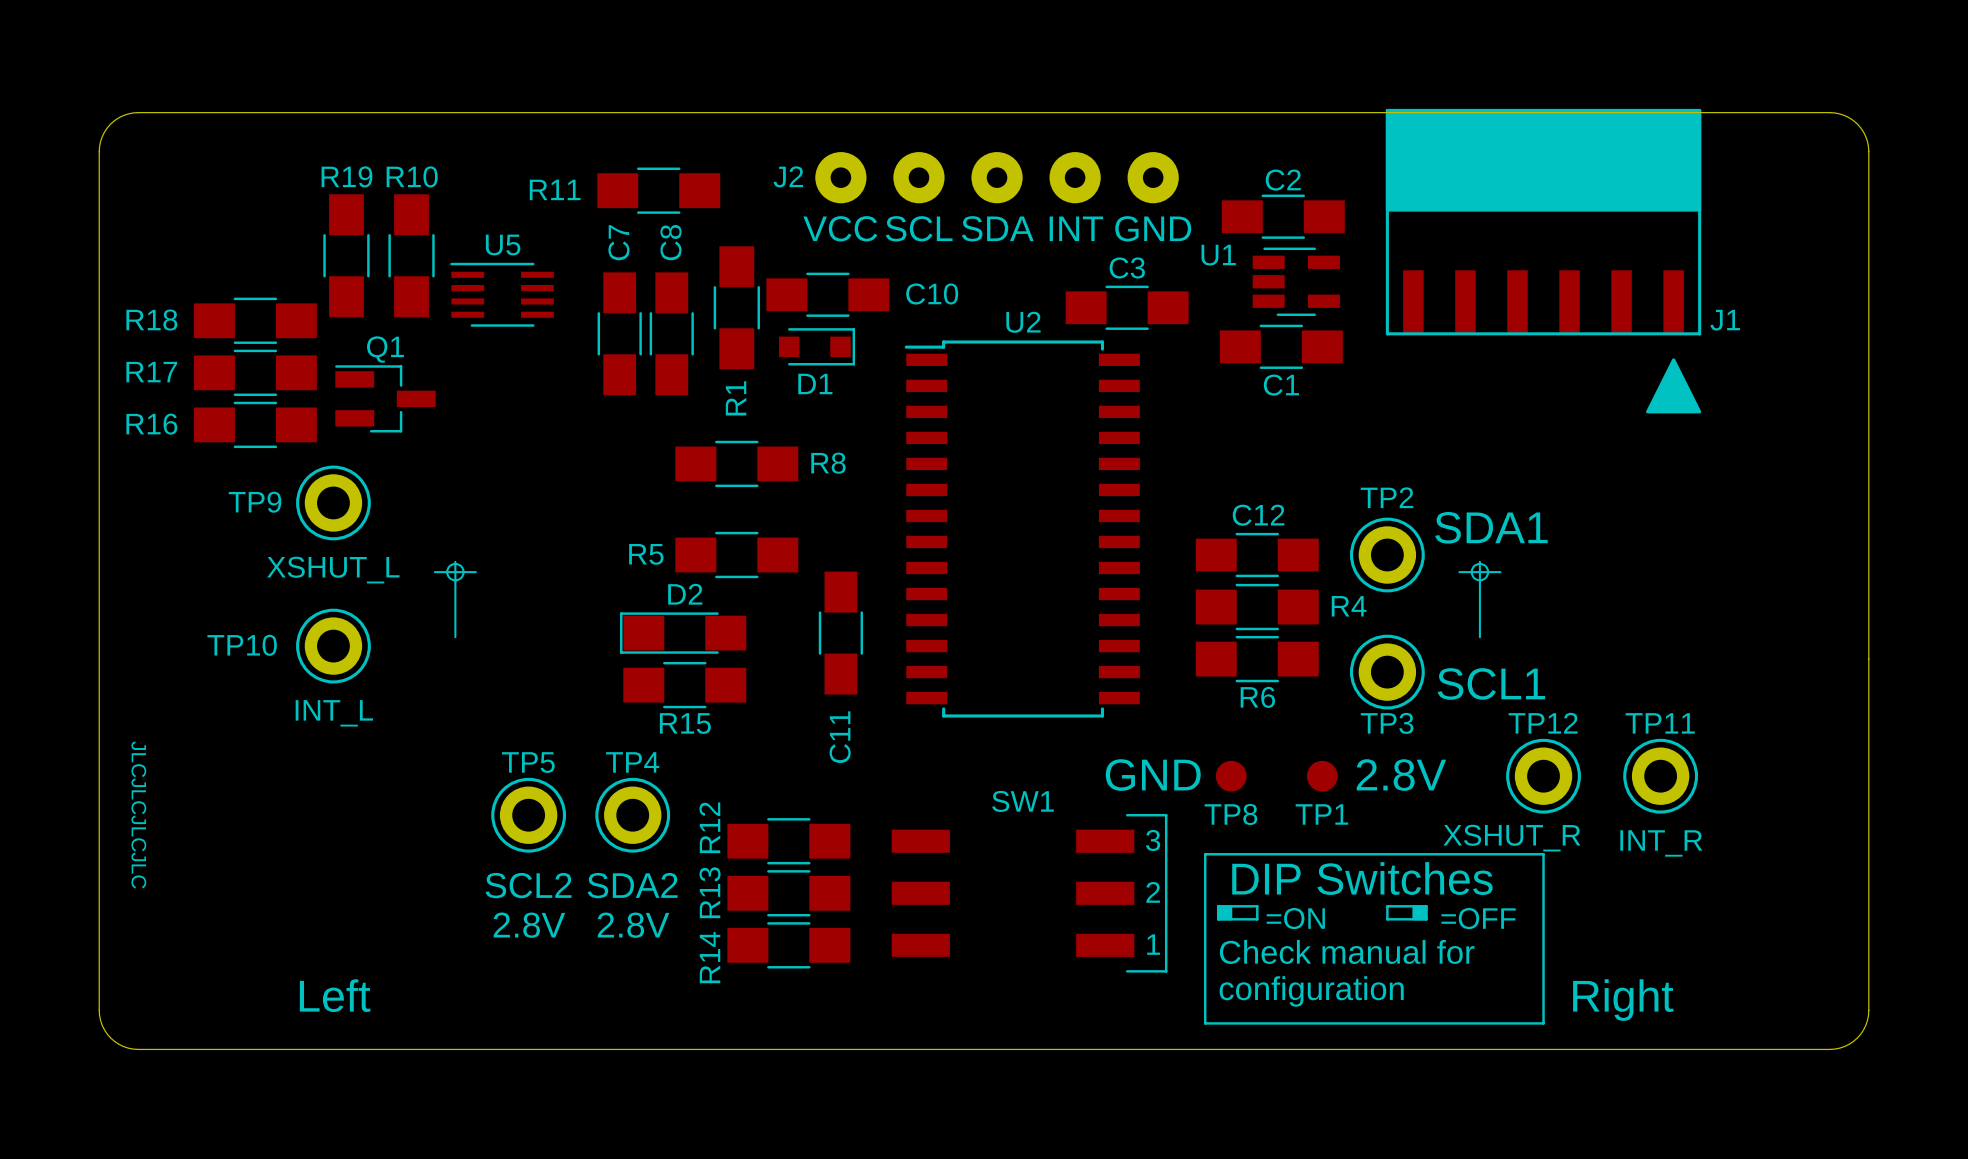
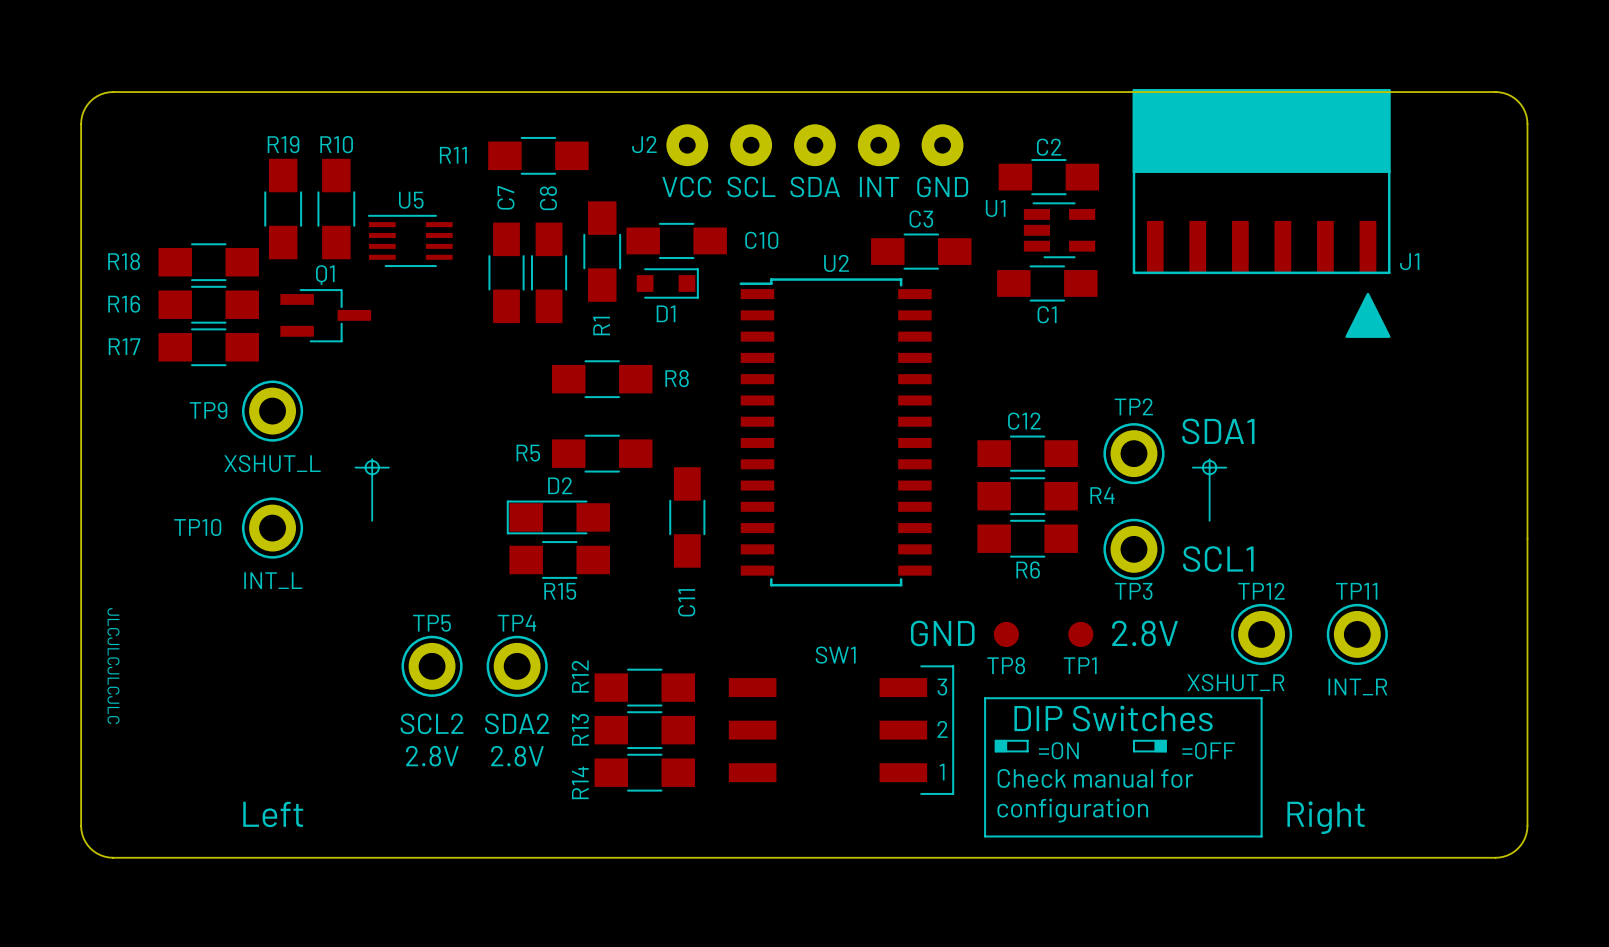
Q1 footprint: [335, 365, 436, 433] -> [280, 289, 372, 343]
R17 name: R17 (151, 372) -> R16 (124, 304)
R16 name: R16 (151, 424) -> R17 (124, 346)

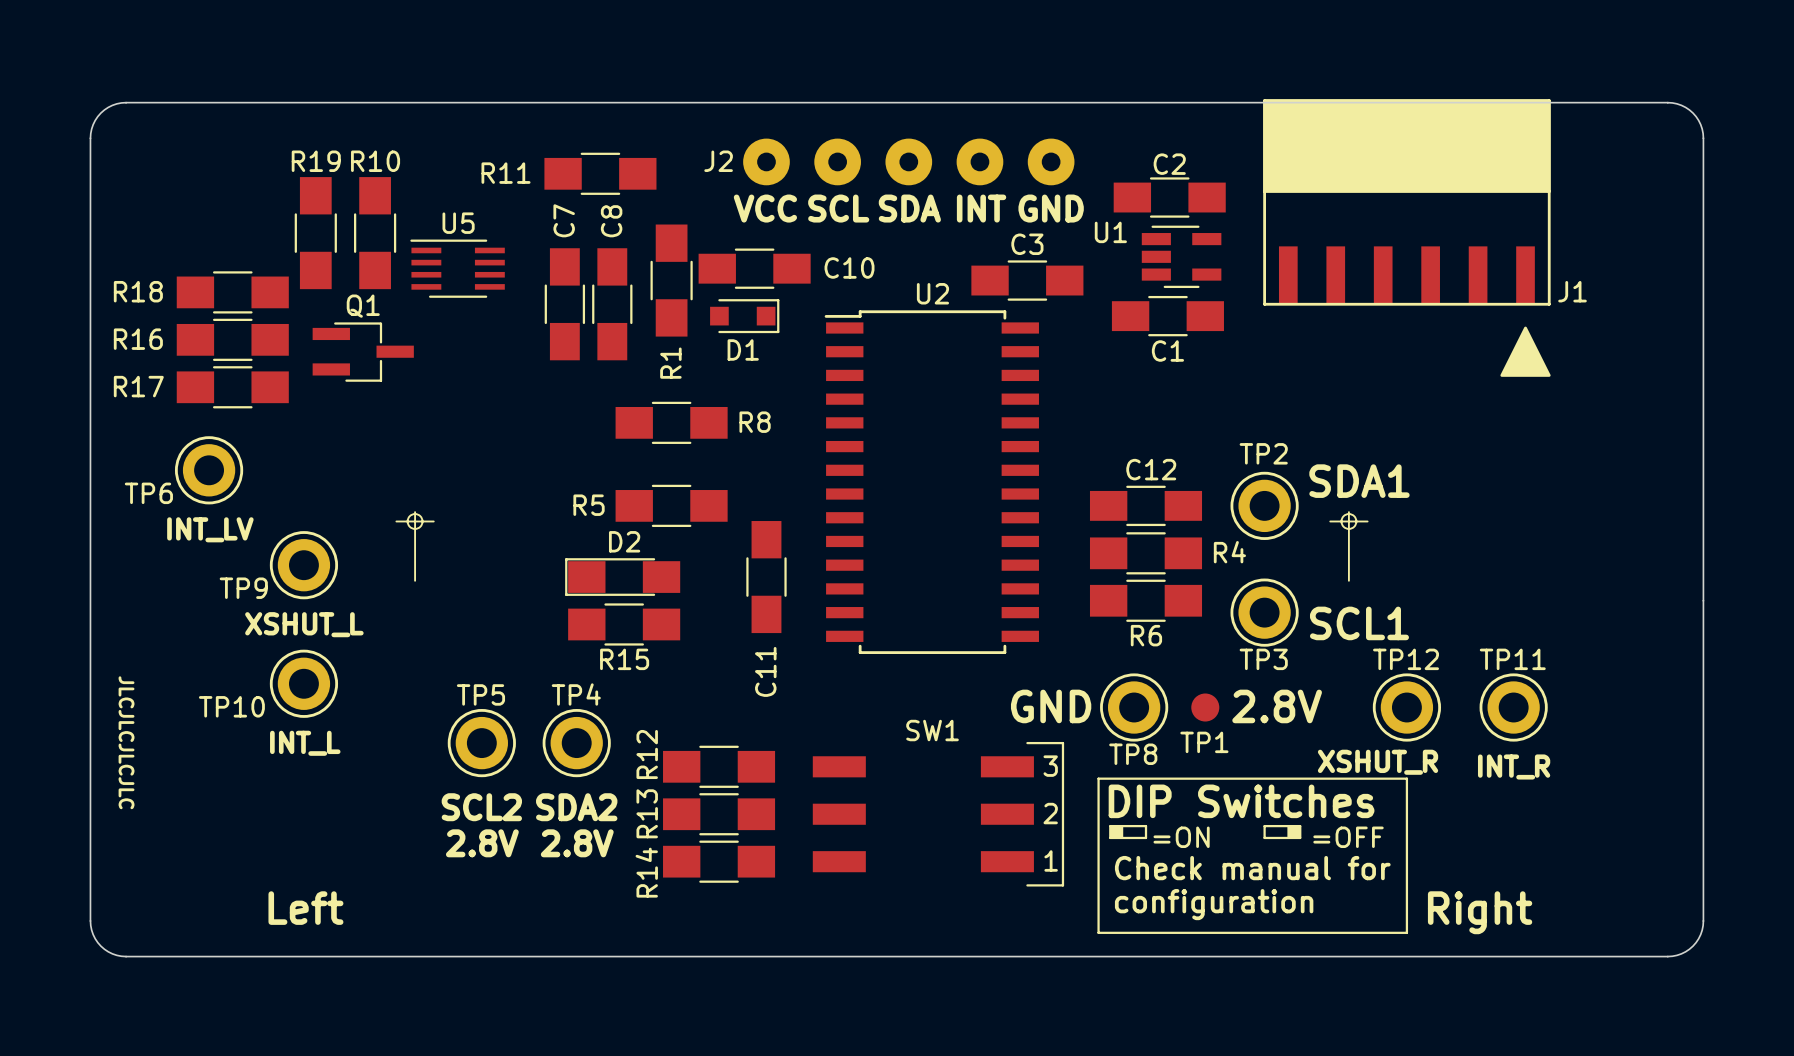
TP9 name position: TP9 (208, 410) -> TP9 (243, 588)
TP9 position: (272, 411) -> (303, 565)
TP6: none -> (209, 470)
text position: XSHUT_L (272, 463) -> XSHUT_L (304, 624)
text: none -> INT_LV (210, 529)
TP10 name position: TP10 (197, 527) -> TP10 (231, 706)
TP10 position: (272, 528) -> (303, 683)
text position: INT_L (273, 580) -> INT_L (305, 743)
TP8 footprint: [993, 621, 1019, 647] -> [1100, 673, 1169, 742]

